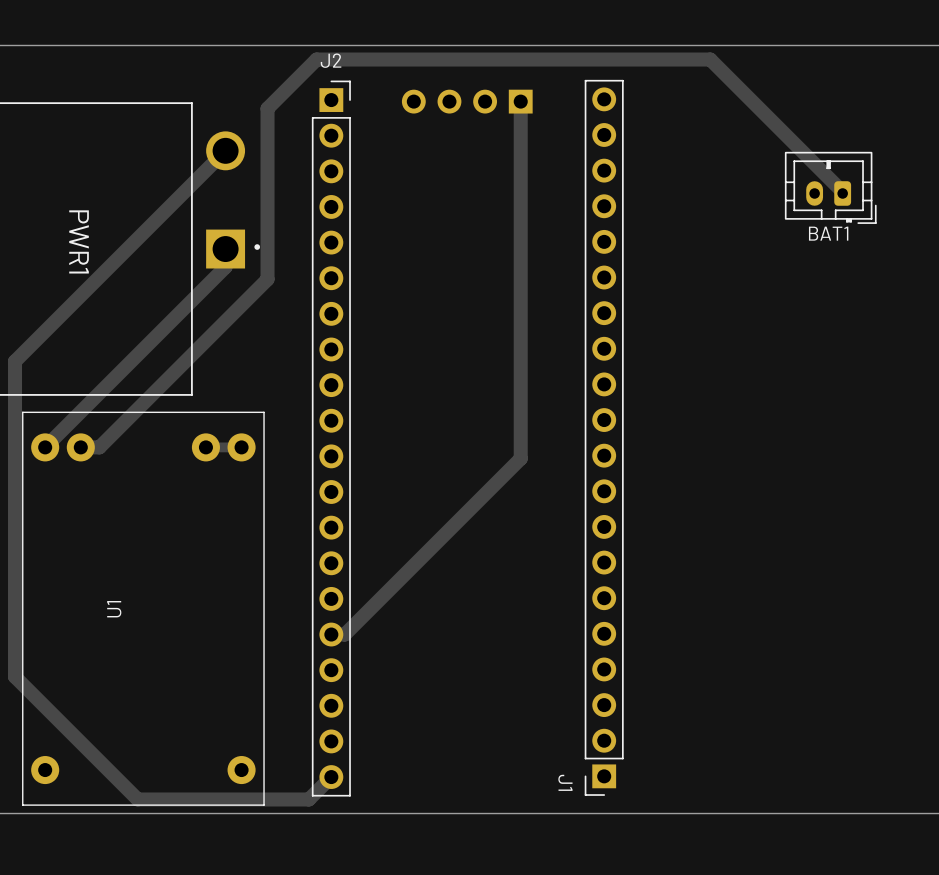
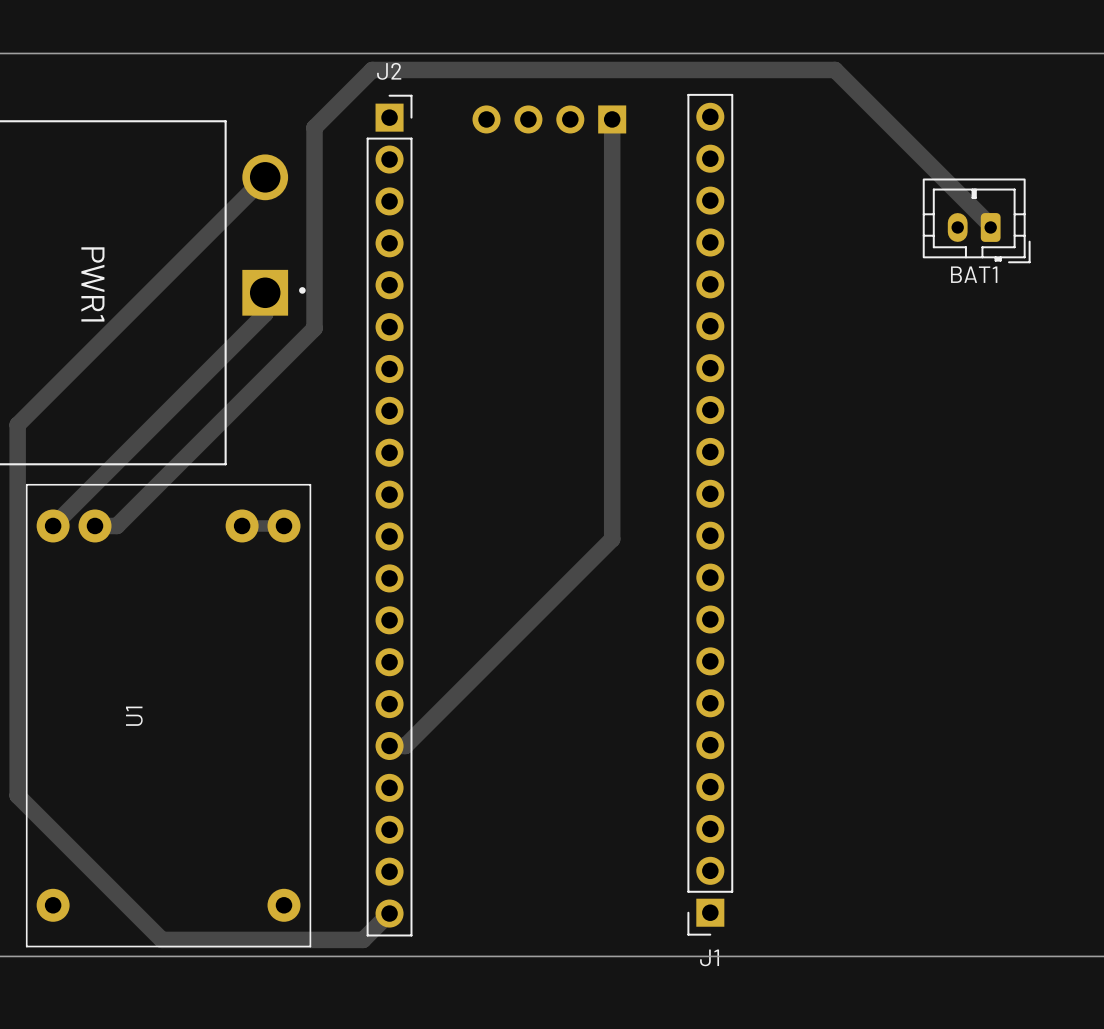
J1 name rotation: 0° (565, 782) -> 90° counterclockwise (709, 957)
J1 name position: J1 (565, 782) -> J1 (709, 957)

